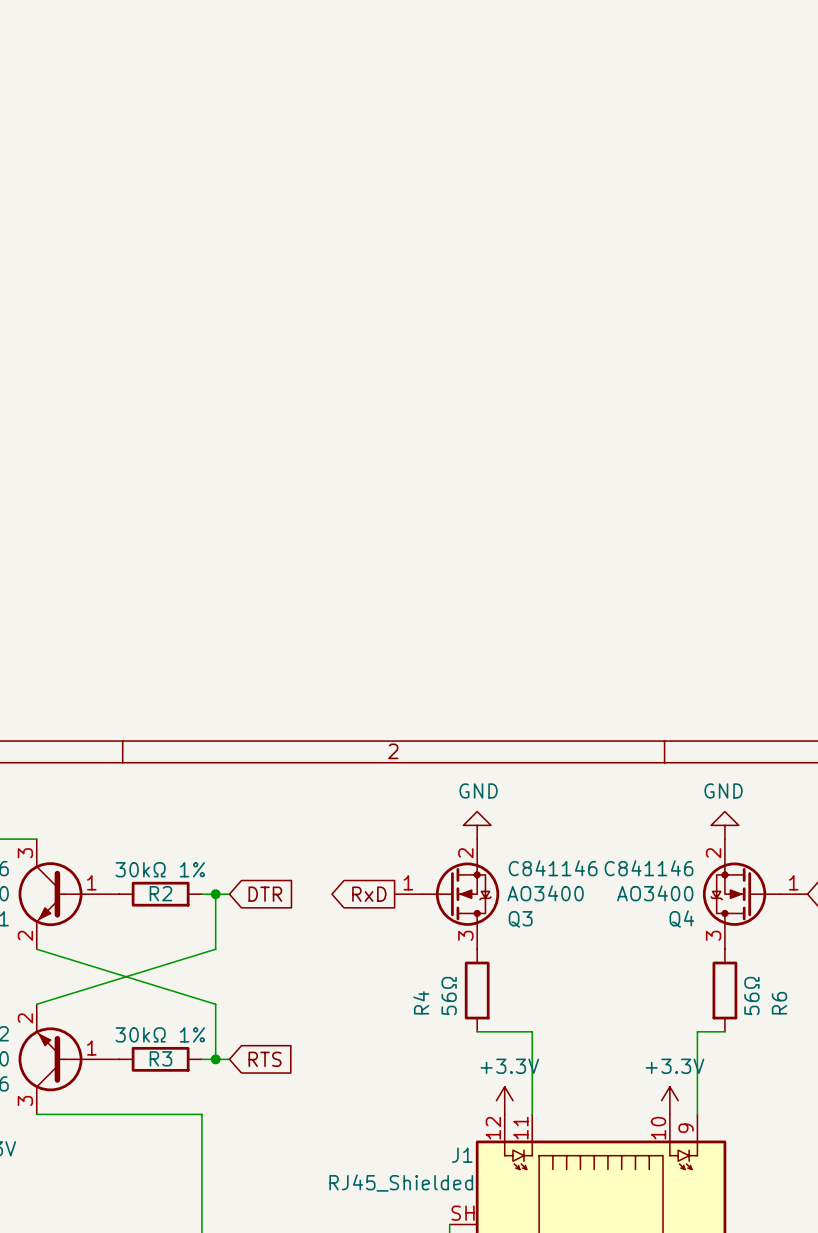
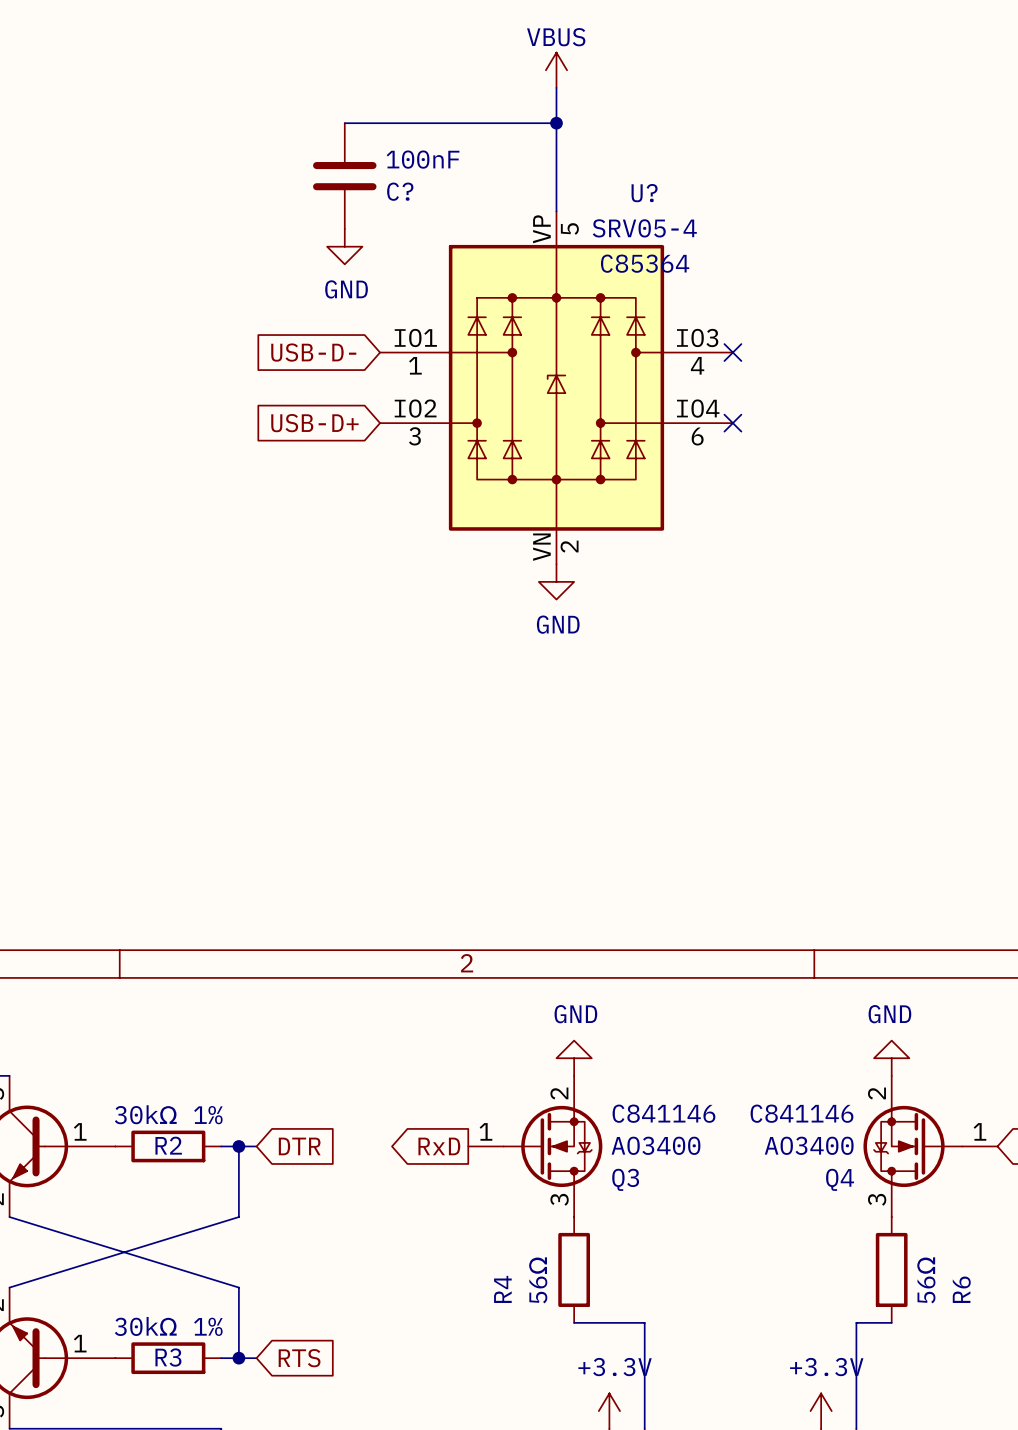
power symbol: none -> VBUS (556, 70)
wire: none -> (556, 87) (556, 211)
wire: none -> (344, 123) (556, 123)
junction: none -> (556, 123)
C?: none -> 100nF (344, 176)
power symbol: none -> GND (344, 246)
global label: none -> USB-D- (313, 352)
no-connect mark: none -> (732, 352)
U?: none -> SRV05-4 (556, 387)
global label: none -> USB-D+ (314, 423)
no-connect mark: none -> (732, 423)
power symbol: none -> GND (556, 581)

